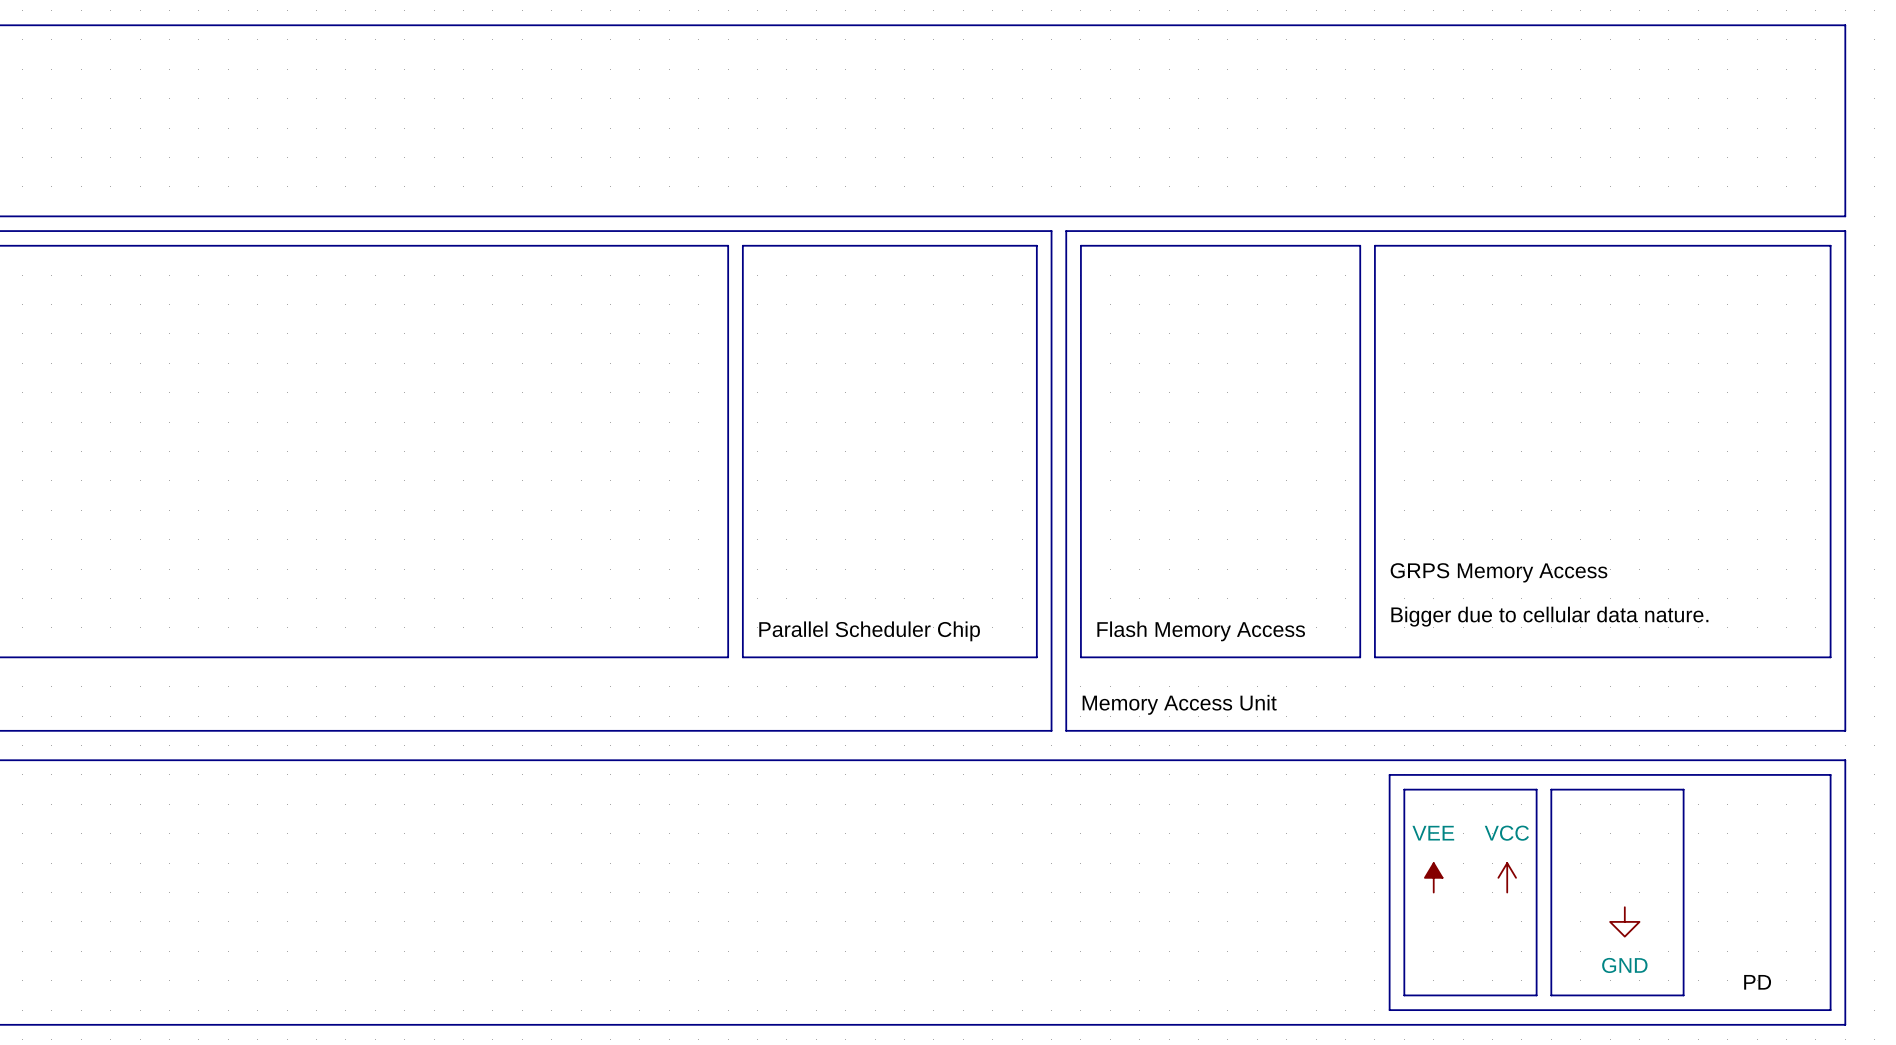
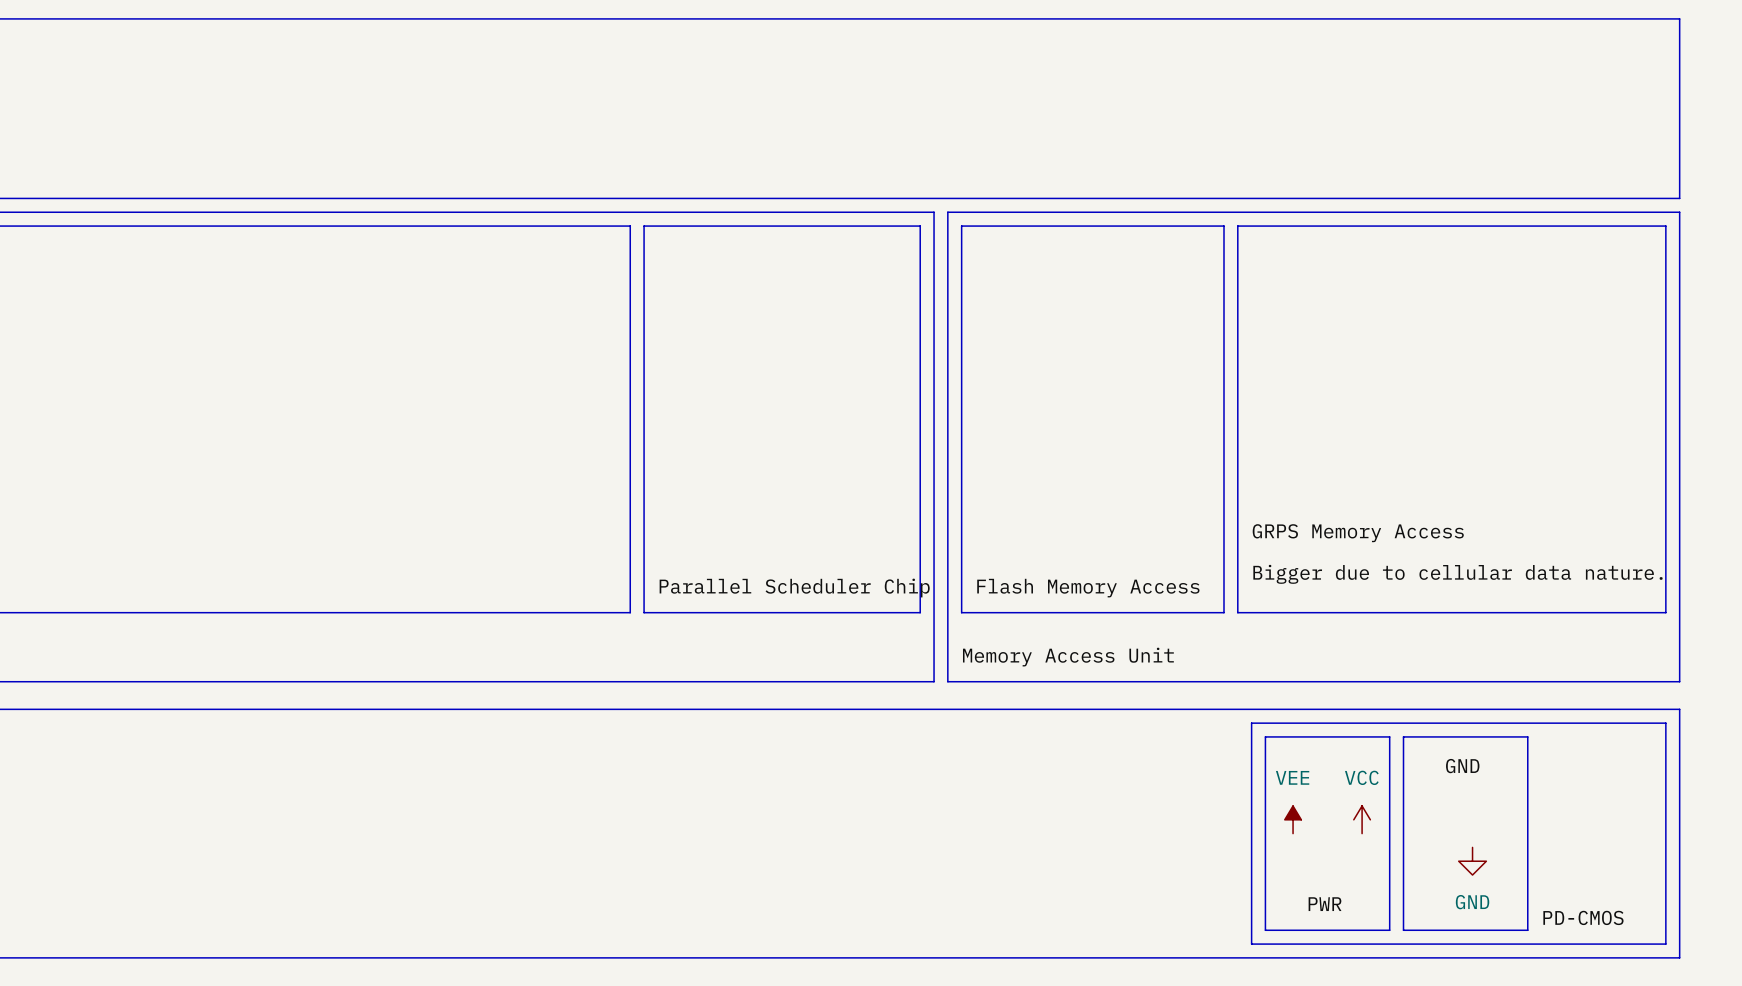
label: none -> GND (1462, 766)
label: none -> PWR (1325, 904)
label: none -> PD-CMOS (1583, 917)
label: PD (1757, 982) -> none

